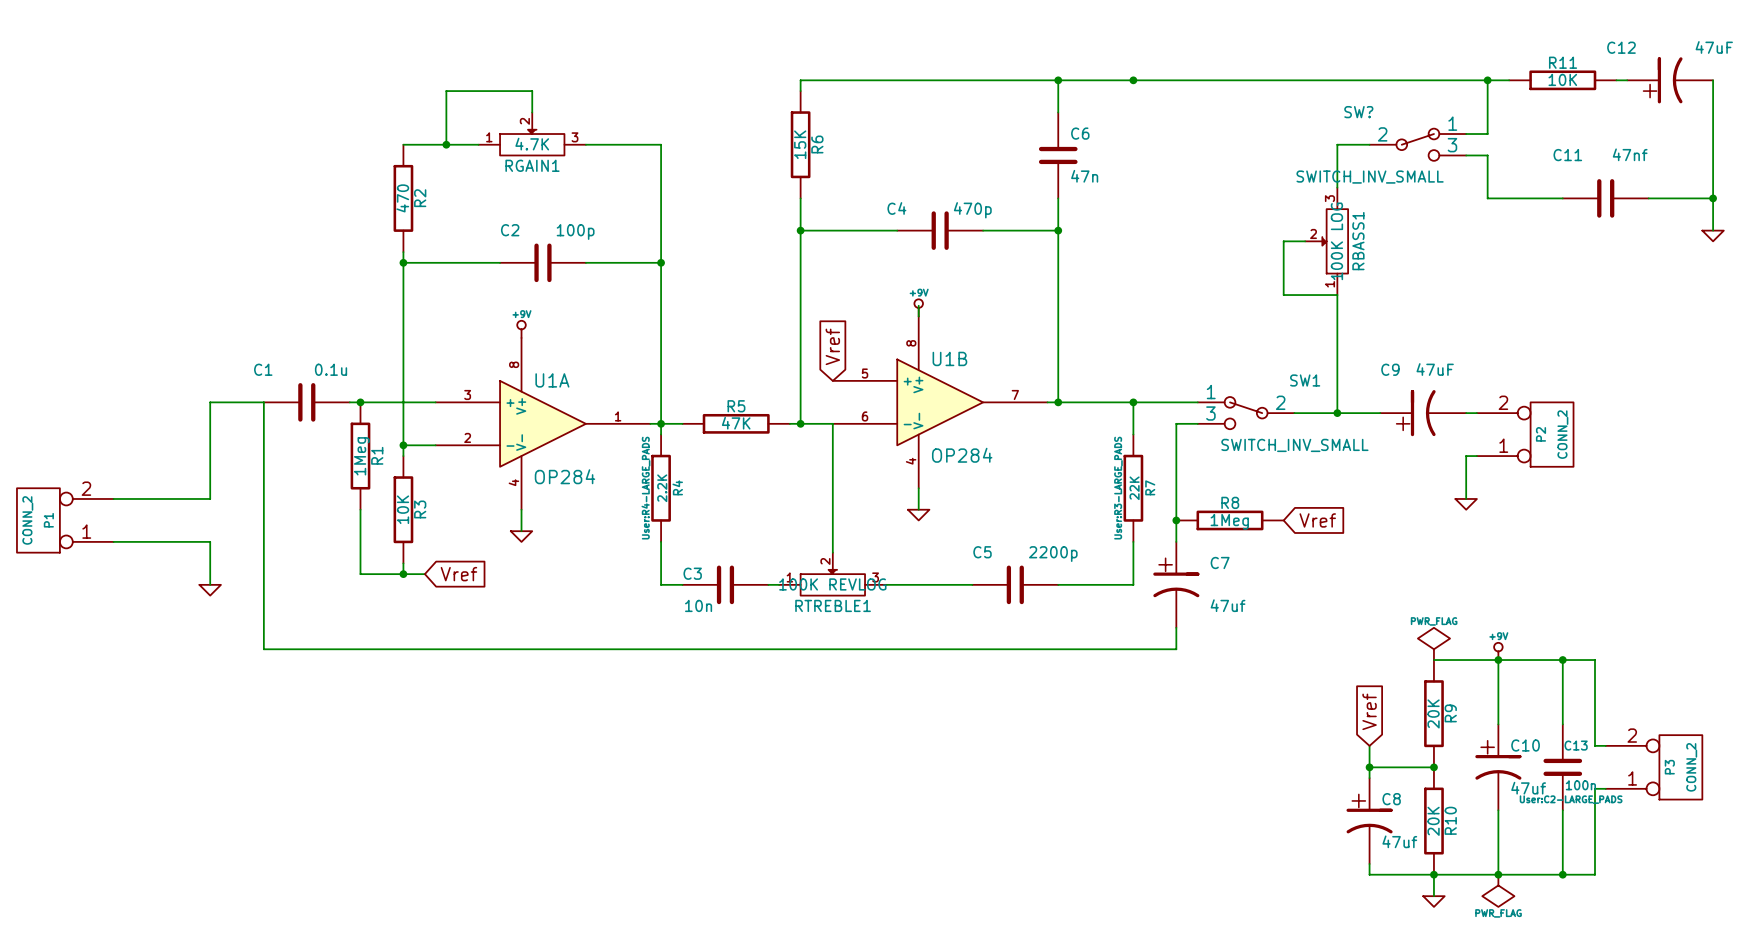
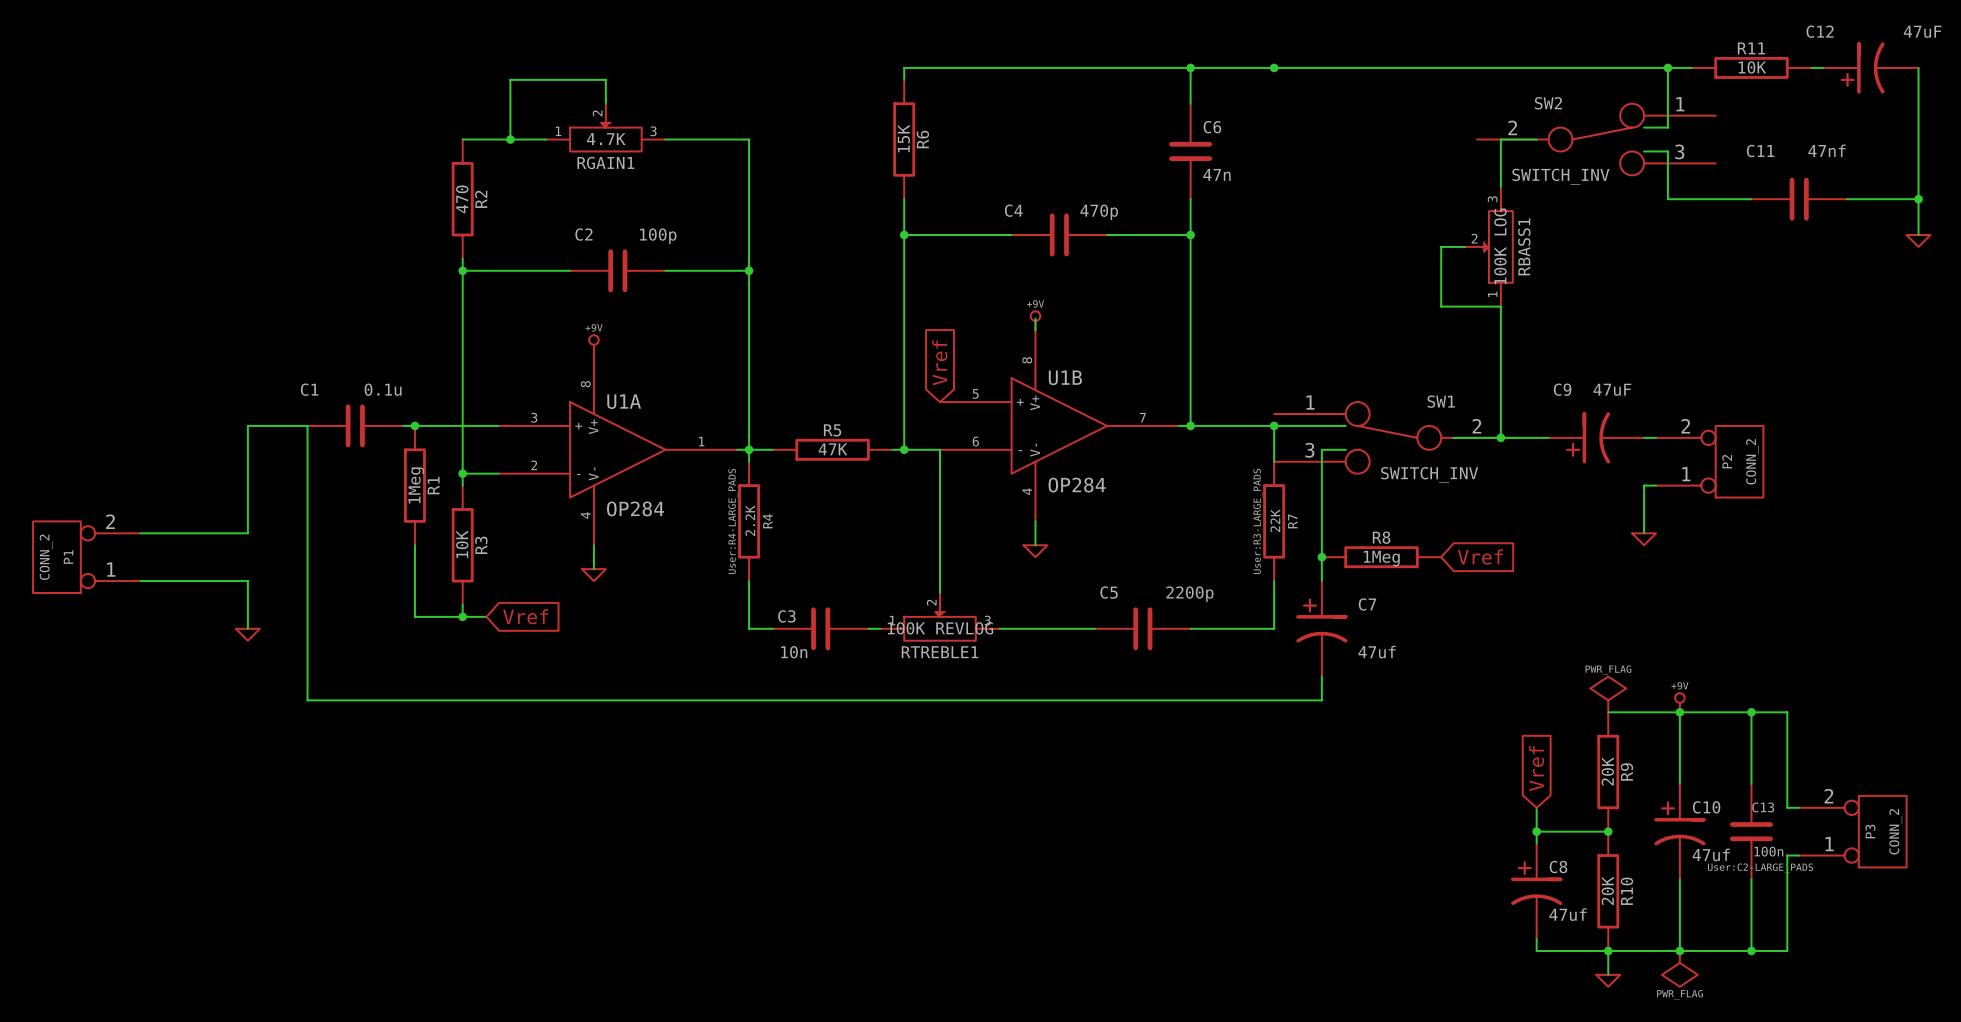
SW?: SWITCH_INV_SMALL (1417, 144) -> none
SW2: none -> SWITCH_INV (1596, 139)
SW1 symbol: [1197, 397, 1295, 430] -> [1274, 402, 1513, 474]
SW1 value: SWITCH_INV_SMALL (1294, 445) -> SWITCH_INV (1429, 475)

